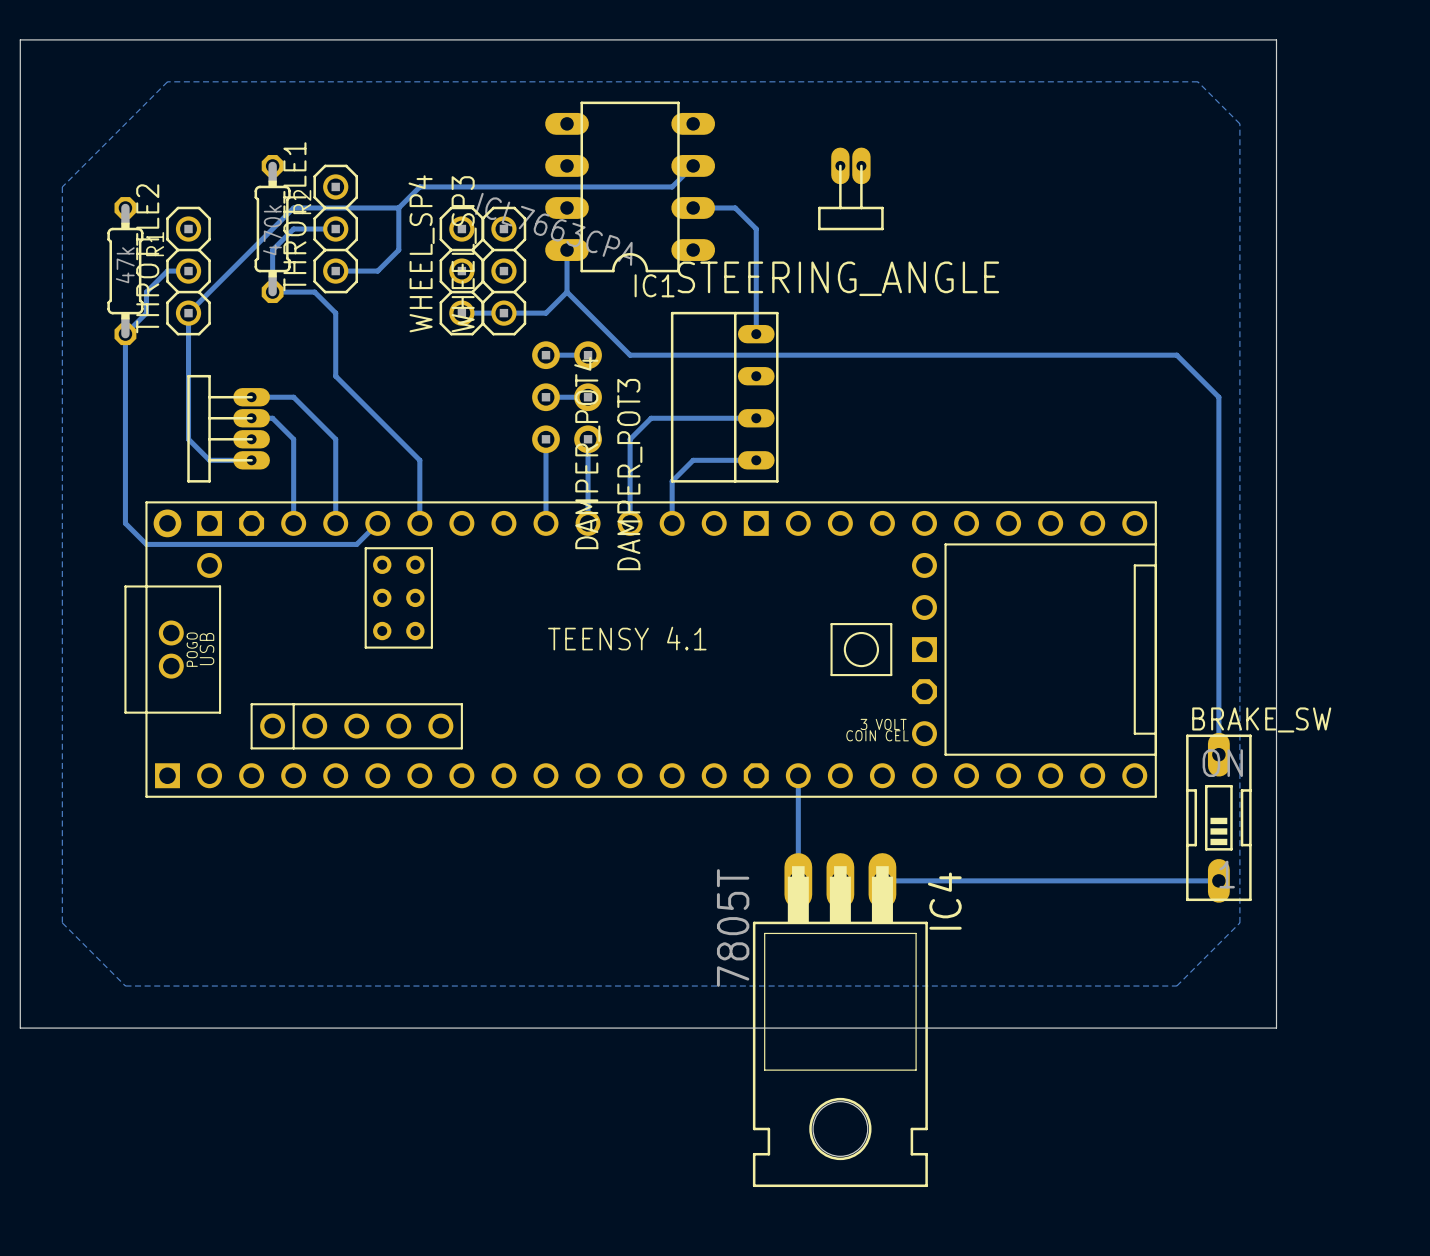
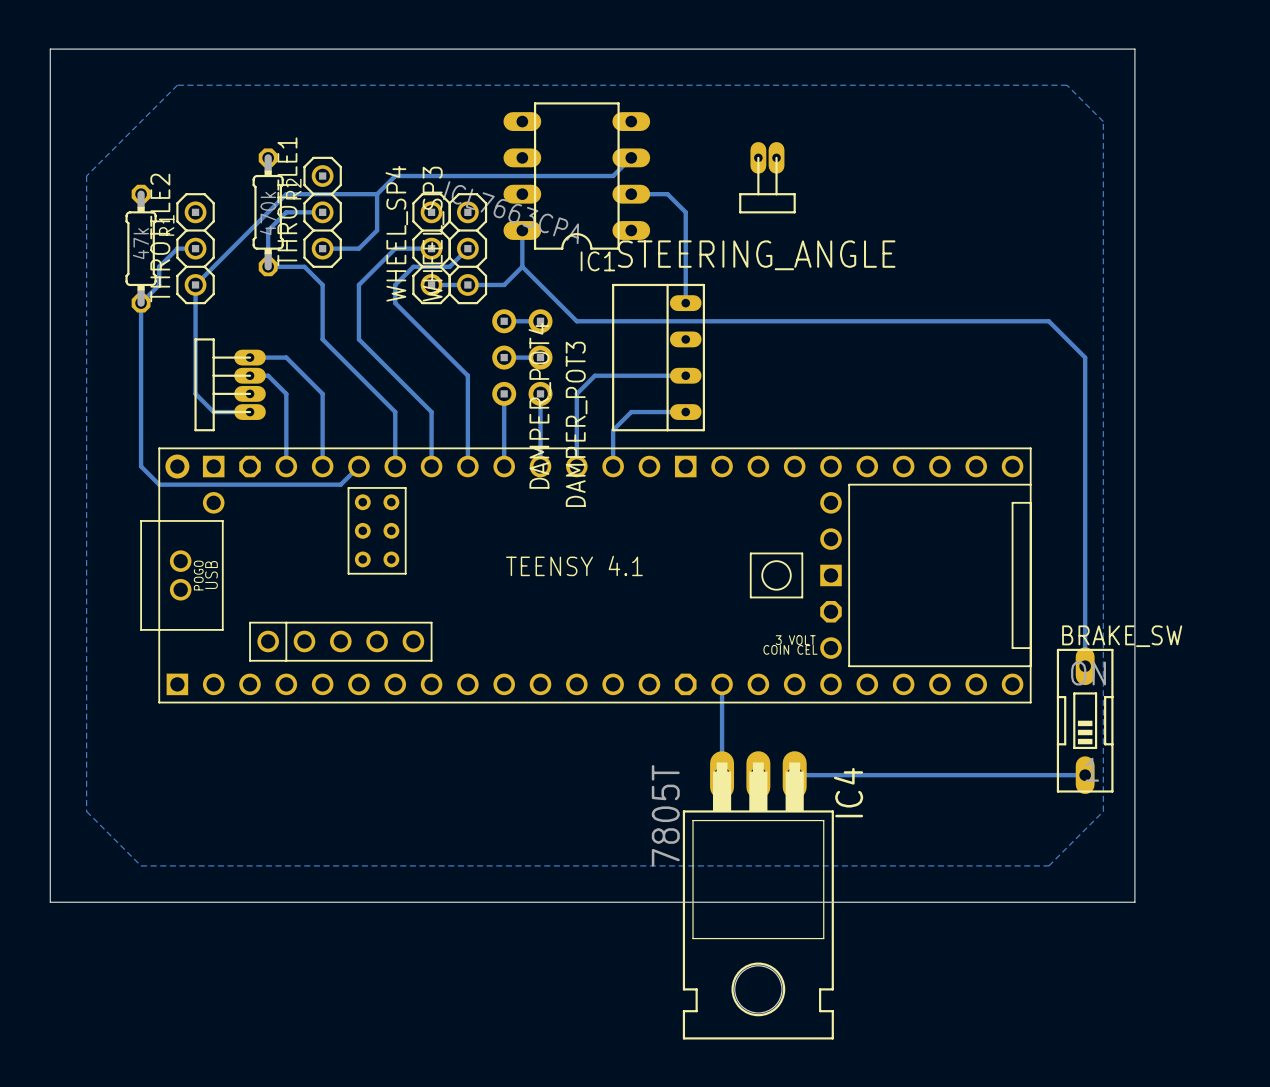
bottom track: none -> (431, 248) (395, 248) (358, 284) (358, 339) (431, 412) (431, 466)
bottom track: none -> (467, 248) (449, 266) (413, 266) (395, 284) (395, 303) (467, 375) (467, 466)

